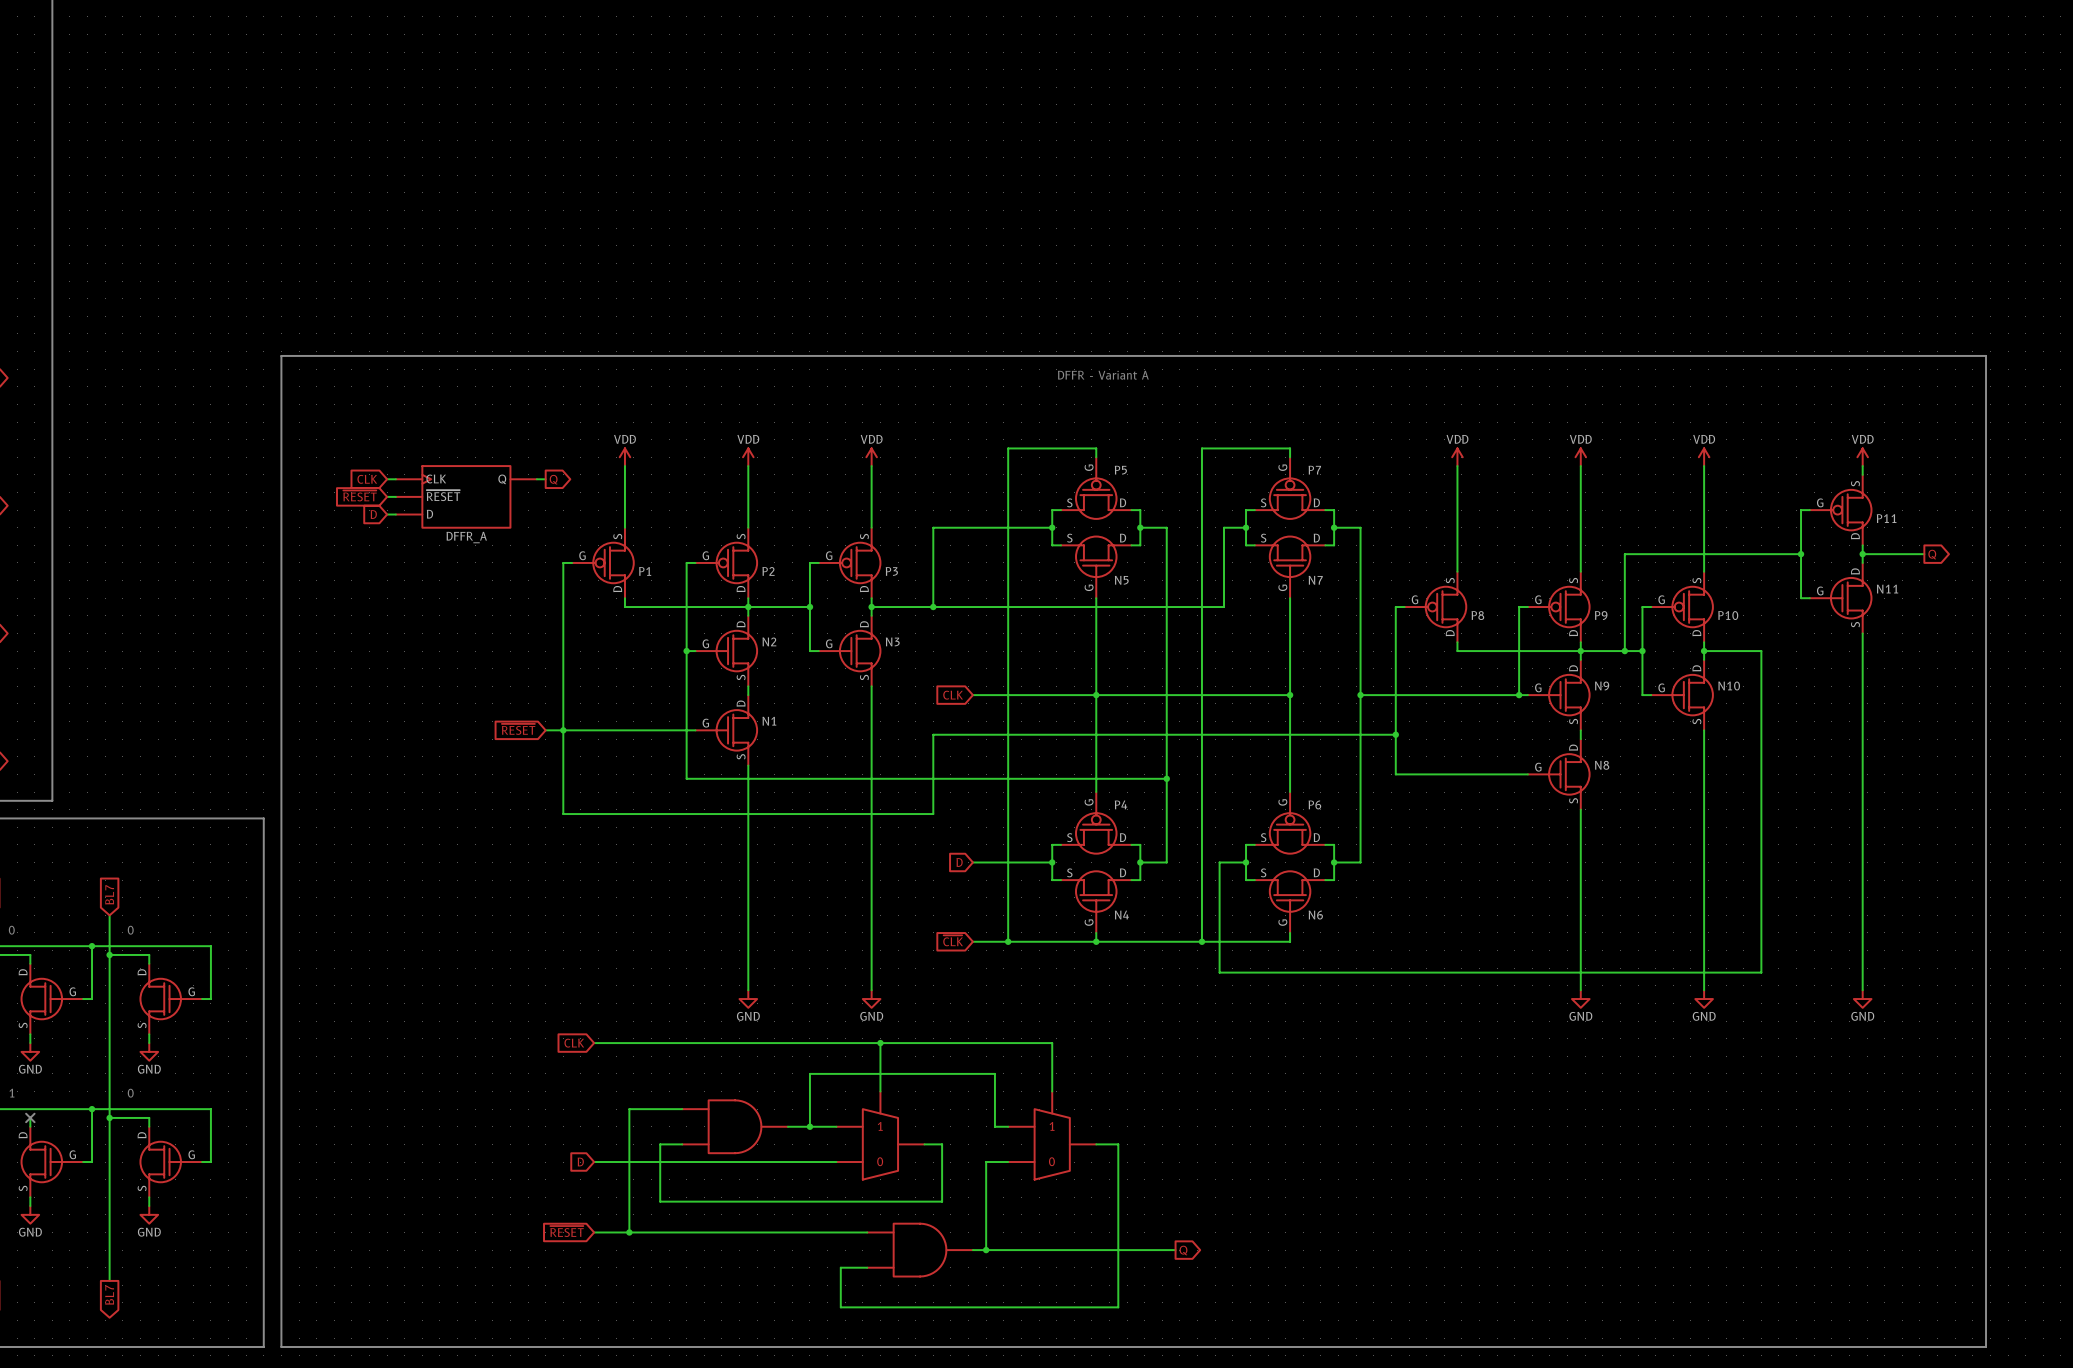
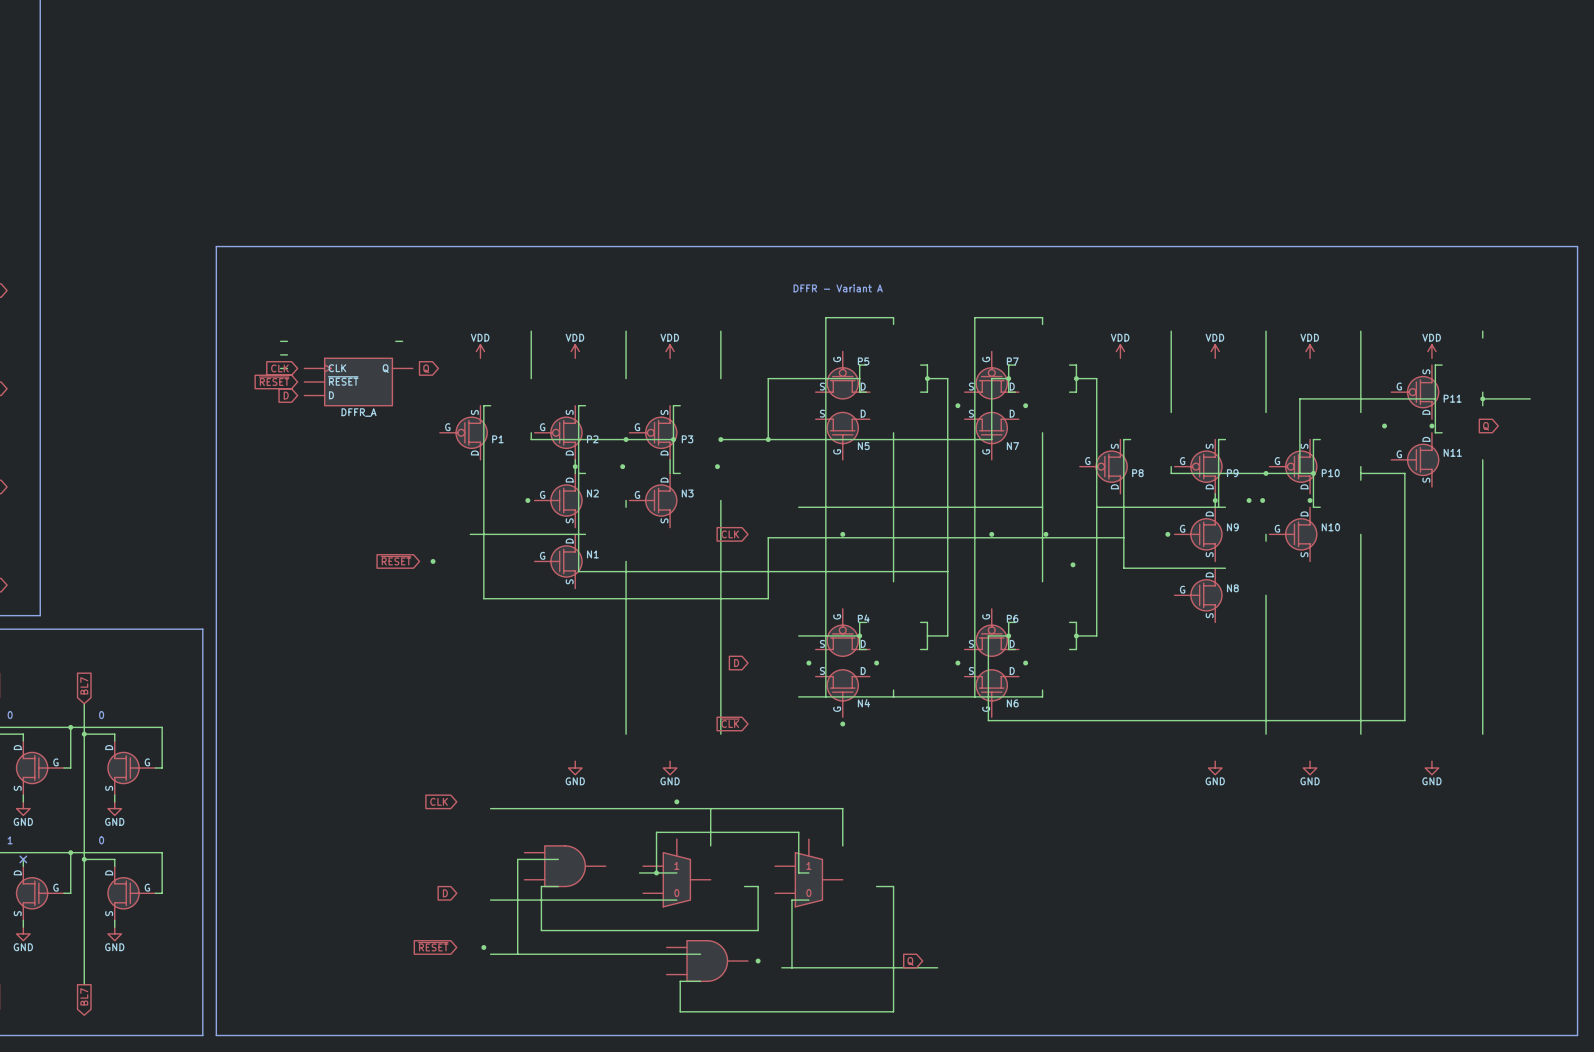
line: (281, 355) (1986, 355) (1986, 1347) -> (216, 273) (216, 246) (1577, 246) (1577, 1035) (1526, 1035)
wire: (1096, 457) (1096, 448) (1008, 448) (1008, 941) -> (893, 324) (893, 317) (825, 317) (825, 696)
wire: (1290, 457) (1290, 448) (1201, 448) (1201, 941) -> (1042, 324) (1042, 317) (974, 317) (974, 696)
wire: (624, 466) (624, 527) -> (531, 331) (531, 378)
wire: (748, 466) (748, 527) -> (626, 331) (626, 378)
wire: (871, 466) (871, 527) -> (720, 331) (720, 378)
wire: (1457, 466) (1457, 571) -> (1171, 331) (1171, 412)
wire: (1580, 466) (1580, 571) -> (1266, 331) (1266, 412)
wire: (1704, 466) (1704, 571) -> (1360, 331) (1360, 412)
wire: (1862, 466) (1862, 474) -> (1482, 331) (1482, 337)
wire: (387, 479) (395, 479) -> (280, 341) (287, 341)
wire: (536, 479) (545, 479) -> (395, 341) (402, 341)
junction: none -> (927, 378)
junction: none -> (1008, 378)
junction: none -> (1076, 378)
wire: (387, 496) (395, 496) -> (280, 354) (287, 354)
wire: (1061, 510) (1052, 510) (1052, 545) (1061, 545) -> (866, 365) (859, 365) (859, 392) (866, 392)
wire: (1131, 510) (1140, 510) (1140, 545) (1131, 545) -> (920, 365) (927, 365) (927, 392) (920, 392)
wire: (1254, 510) (1246, 510) (1246, 545) (1254, 545) -> (1015, 365) (1008, 365) (1008, 392) (1015, 392)
wire: (1325, 510) (1334, 510) (1334, 545) (1325, 545) -> (1069, 365) (1076, 365) (1076, 392) (1069, 392)
wire: (1809, 510) (1801, 510) (1801, 598) (1809, 598) -> (1442, 365) (1435, 365) (1435, 432) (1442, 432)
wire: (387, 514) (395, 514) -> (280, 368) (287, 368)
junction: none -> (1482, 398)
wire: none -> (585, 405) (578, 405) (578, 571) (947, 571)
wire: (1052, 527) (933, 527) (933, 607) -> (859, 378) (768, 378) (768, 439)
junction: (1052, 527) -> none
wire: (1140, 527) (1166, 527) (1166, 862) (1140, 862) -> (927, 378) (947, 378) (947, 635) (927, 635)
junction: (1140, 527) -> none
wire: (1246, 527) (1224, 527) (1224, 607) (871, 607) -> (1008, 378) (991, 378) (991, 439) (720, 439)
wire: (1334, 527) (1360, 527) (1360, 862) (1334, 862) -> (1076, 378) (1096, 378) (1096, 635) (1076, 635)
wire: (1862, 545) (1862, 562) -> (1482, 392) (1482, 405)
wire: (1801, 554) (1624, 554) (1624, 651) -> (1435, 398) (1299, 398) (1299, 473)
wire: (1862, 554) (1924, 554) -> (1482, 398) (1530, 398)
wire: (572, 562) (563, 562) (563, 814) (933, 814) (933, 734) (1395, 734) -> none
wire: (695, 562) (686, 562) (686, 778) -> (490, 405) (483, 405) (483, 598) (527, 598)
wire: (818, 562) (809, 562) (809, 651) (818, 651) -> (680, 405) (673, 405) (673, 473) (680, 473)
junction: none -> (626, 439)
junction: none -> (673, 439)
junction: none -> (720, 439)
junction: none -> (768, 439)
wire: (624, 598) (624, 607) (809, 607) -> (531, 432) (531, 439) (673, 439)
wire: (1096, 598) (1096, 792) -> (893, 432) (893, 581)
wire: (1290, 598) (1290, 792) -> (1042, 432) (1042, 581)
junction: (871, 607) -> none
wire: (1404, 607) (1395, 607) (1395, 774) (1527, 774) -> (1130, 439) (1123, 439) (1123, 568) (1225, 568)
wire: (1527, 607) (1519, 607) (1519, 695) -> (1225, 439) (1218, 439) (1218, 507)
wire: (1651, 607) (1642, 607) (1642, 695) (1651, 695) -> (1320, 439) (1313, 439) (1313, 507) (1320, 507)
junction: none -> (1266, 473)
junction: none -> (1313, 473)
wire: (1862, 633) (1862, 990) -> (1482, 459) (1482, 734)
wire: (1457, 642) (1457, 651) (1642, 651) -> (1171, 466) (1171, 473) (1313, 473)
wire: (1704, 642) (1704, 659) -> (1360, 466) (1360, 480)
wire: (686, 651) (695, 651) -> (578, 473) (585, 473)
wire: (1704, 651) (1761, 651) (1761, 972) (1219, 972) (1219, 862) (1246, 862) -> (1360, 473) (1404, 473) (1404, 720) (988, 720) (988, 635) (1008, 635)
wire: (748, 686) (748, 695) -> (626, 500) (626, 507)
wire: (871, 686) (871, 990) -> (720, 500) (720, 734)
wire: (972, 695) (1290, 695) -> (798, 507) (1042, 507)
wire: (1360, 695) (1527, 695) -> (1096, 507) (1225, 507)
wire: (545, 730) (695, 730) -> (470, 534) (585, 534)
wire: (1580, 730) (1580, 739) -> (1266, 534) (1266, 541)
wire: (1704, 730) (1704, 990) -> (1360, 534) (1360, 734)
wire: (748, 765) (748, 990) -> (626, 561) (626, 734)
wire: (999, 778) (1166, 778) -> (768, 598) (768, 537) (1123, 537)
junction: (1166, 778) -> none
wire: (1580, 809) (1580, 990) -> (1266, 595) (1266, 734)
junction: none -> (859, 635)
junction: none -> (1008, 635)
junction: none -> (1076, 635)
wire: (1061, 844) (1052, 844) (1052, 880) (1061, 880) -> (866, 622) (859, 622) (859, 649) (866, 649)
wire: (1131, 844) (1140, 844) (1140, 880) (1131, 880) -> (920, 622) (927, 622) (927, 649) (920, 649)
wire: (1254, 844) (1246, 844) (1246, 880) (1254, 880) -> (1015, 622) (1008, 622) (1008, 649) (1015, 649)
wire: (1325, 844) (1334, 844) (1334, 880) (1325, 880) -> (1069, 622) (1076, 622) (1076, 649) (1069, 649)
wire: (972, 862) (1052, 862) -> (798, 635) (859, 635)
wire: (1096, 932) (1096, 941) -> (893, 690) (893, 696)
wire: (1290, 932) (1290, 941) (972, 941) -> (1042, 690) (1042, 696) (798, 696)
junction: (1008, 941) -> none
junction: (1201, 941) -> none
wire: (594, 1043) (1052, 1043) (1052, 1091) -> (490, 808) (842, 808) (842, 845)
wire: (880, 1043) (880, 1091) -> (710, 808) (710, 845)
wire: (682, 1109) (629, 1109) (629, 1232) -> (558, 859) (517, 859) (517, 954)
wire: (787, 1126) (836, 1126) -> (639, 872) (676, 872)
wire: (809, 1126) (809, 1073) (994, 1073) (994, 1126) (1008, 1126) -> (656, 872) (656, 832) (798, 832) (798, 872) (808, 872)
junction: (809, 1126) -> none
junction: none -> (656, 872)
wire: (682, 1144) (660, 1144) (660, 1201) (942, 1201) (942, 1144) (924, 1144) -> none
wire: (1096, 1144) (1118, 1144) (1118, 1307) (840, 1307) (840, 1267) (867, 1267) -> (876, 886) (893, 886) (893, 1011) (680, 1011) (680, 981) (700, 981)
wire: (594, 1162) (836, 1162) -> (490, 900) (676, 900)
wire: (986, 1162) (1008, 1162) -> (758, 893) (758, 886) (744, 886)
wire: none -> (808, 900) (791, 900) (791, 967)
wire: (986, 1210) (986, 1250) -> (758, 930) (541, 930) (541, 886) (558, 886)
wire: (594, 1232) (867, 1232) -> (490, 954) (700, 954)
wire: (972, 1250) (1175, 1250) -> (781, 967) (937, 967)

